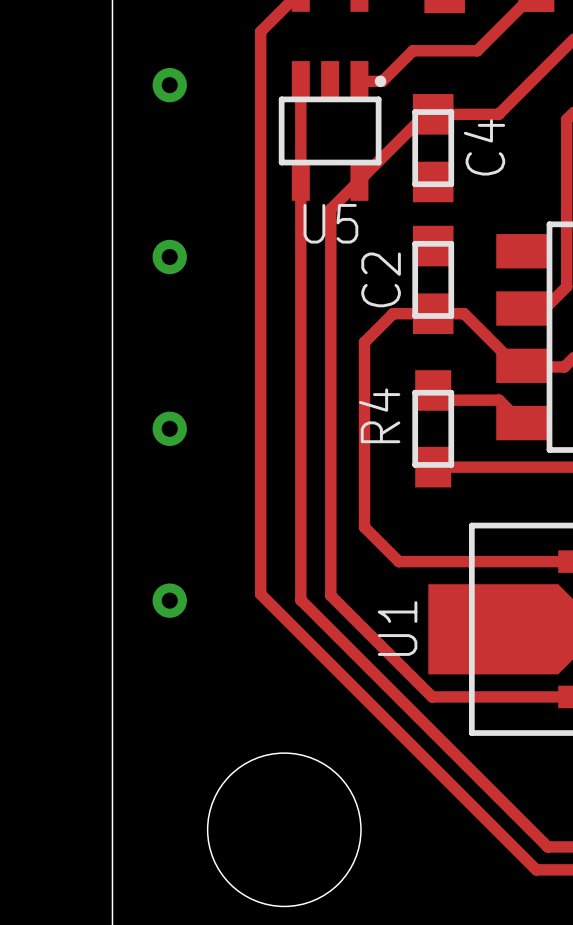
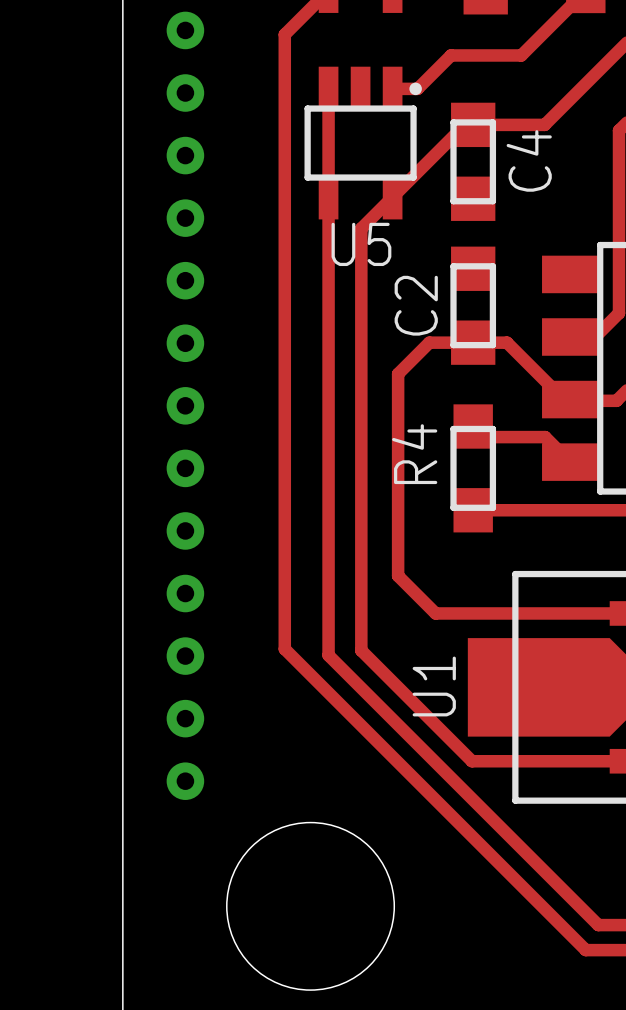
via: none -> (185, 30)
via: none -> (185, 155)
via: none -> (185, 218)
via: none -> (185, 343)
via: none -> (185, 405)
via: none -> (185, 530)
via: none -> (185, 593)
via: none -> (185, 718)
via: none -> (185, 781)

